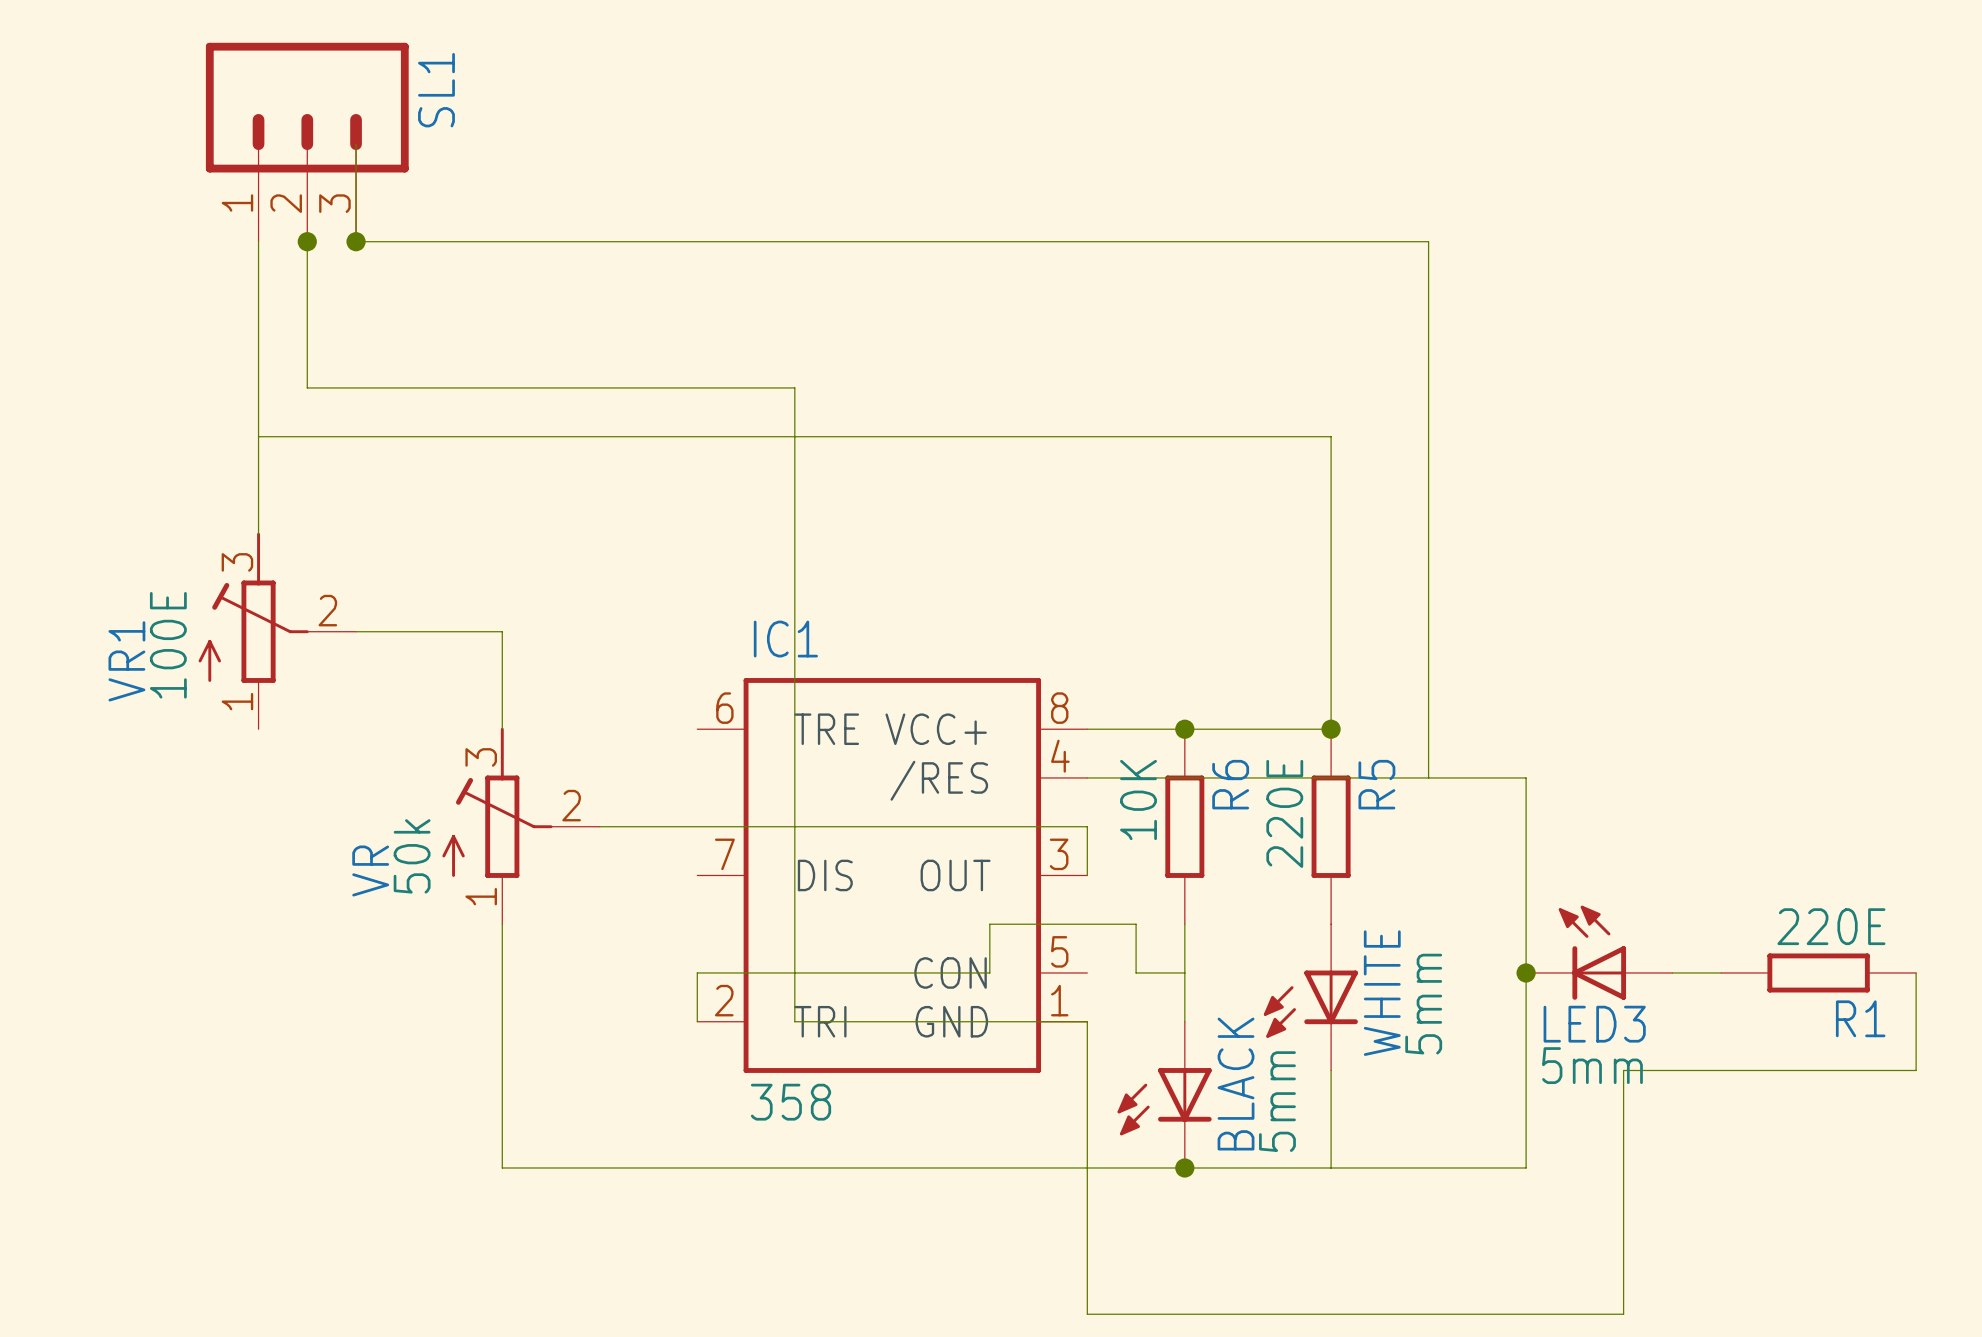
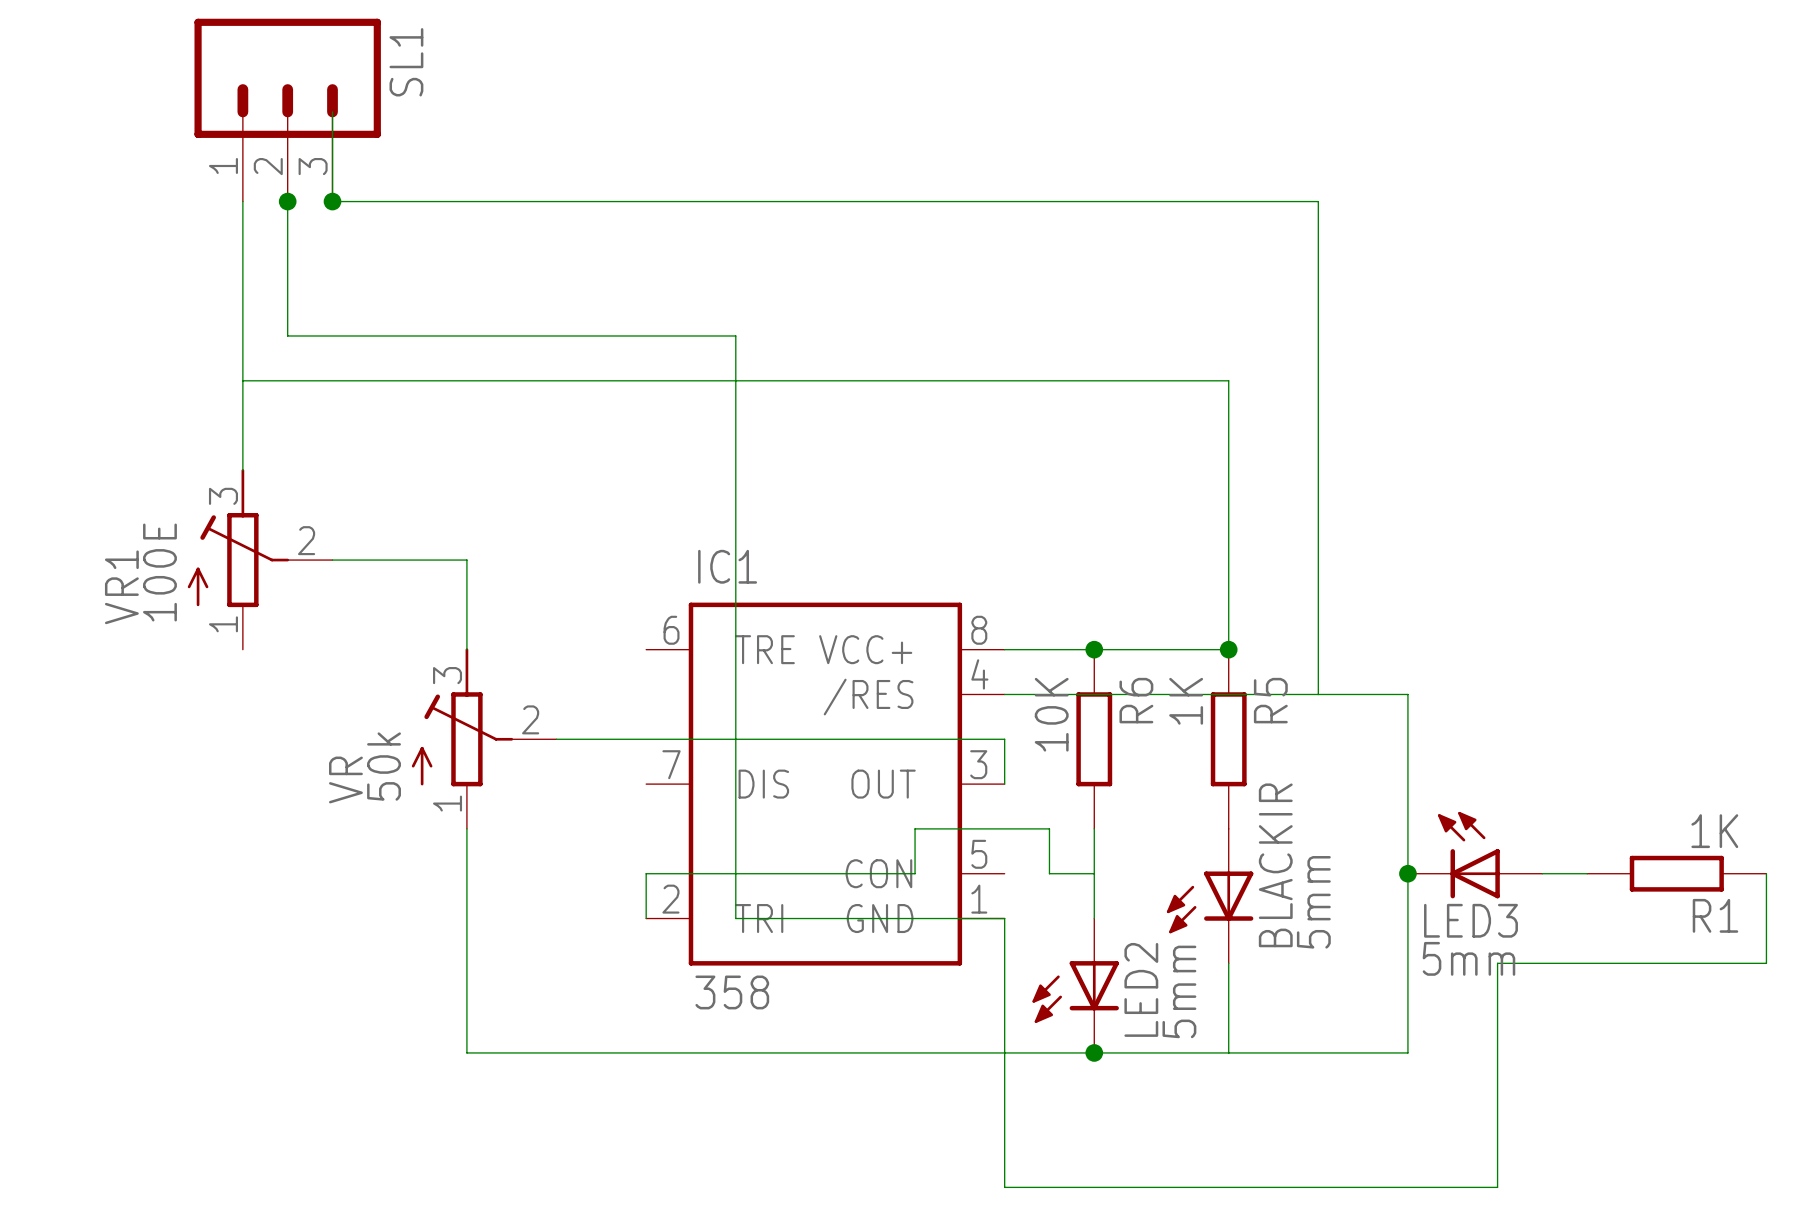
R5 value: 220E (1284, 813) -> 1K (1186, 701)
R1 value: 220E (1831, 926) -> 1K (1714, 831)
WHITE name: WHITE (1382, 993) -> BLACKIR (1275, 865)
BLACK name: BLACK (1236, 1084) -> LED2 (1141, 989)

